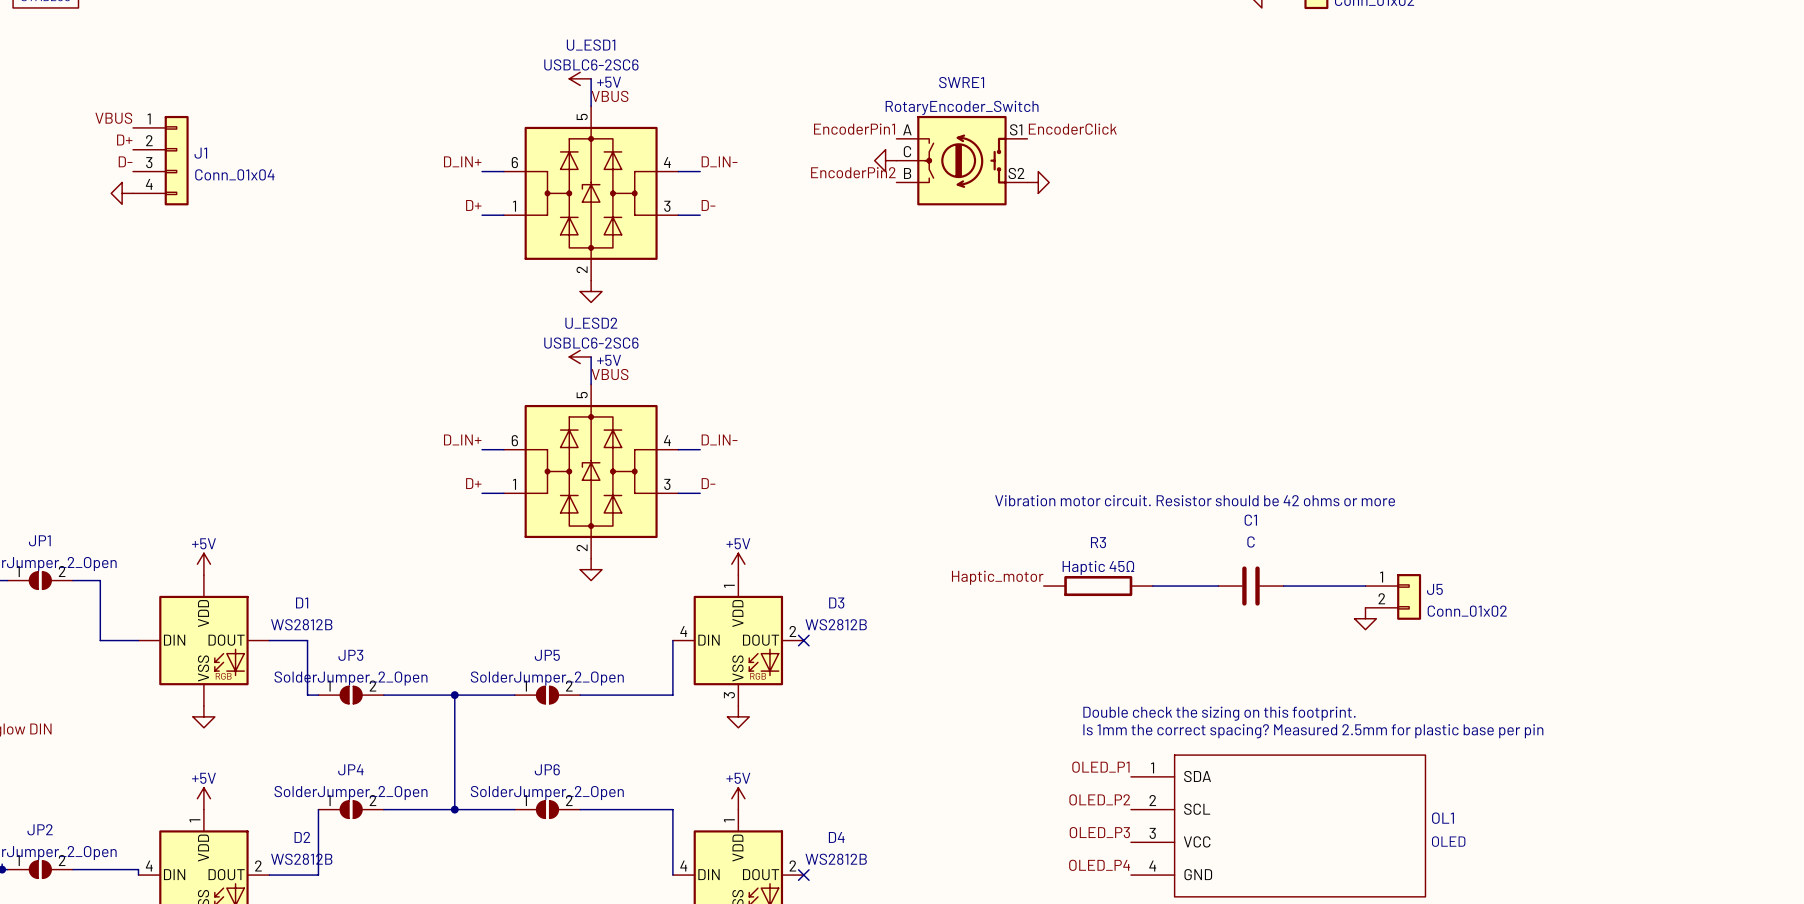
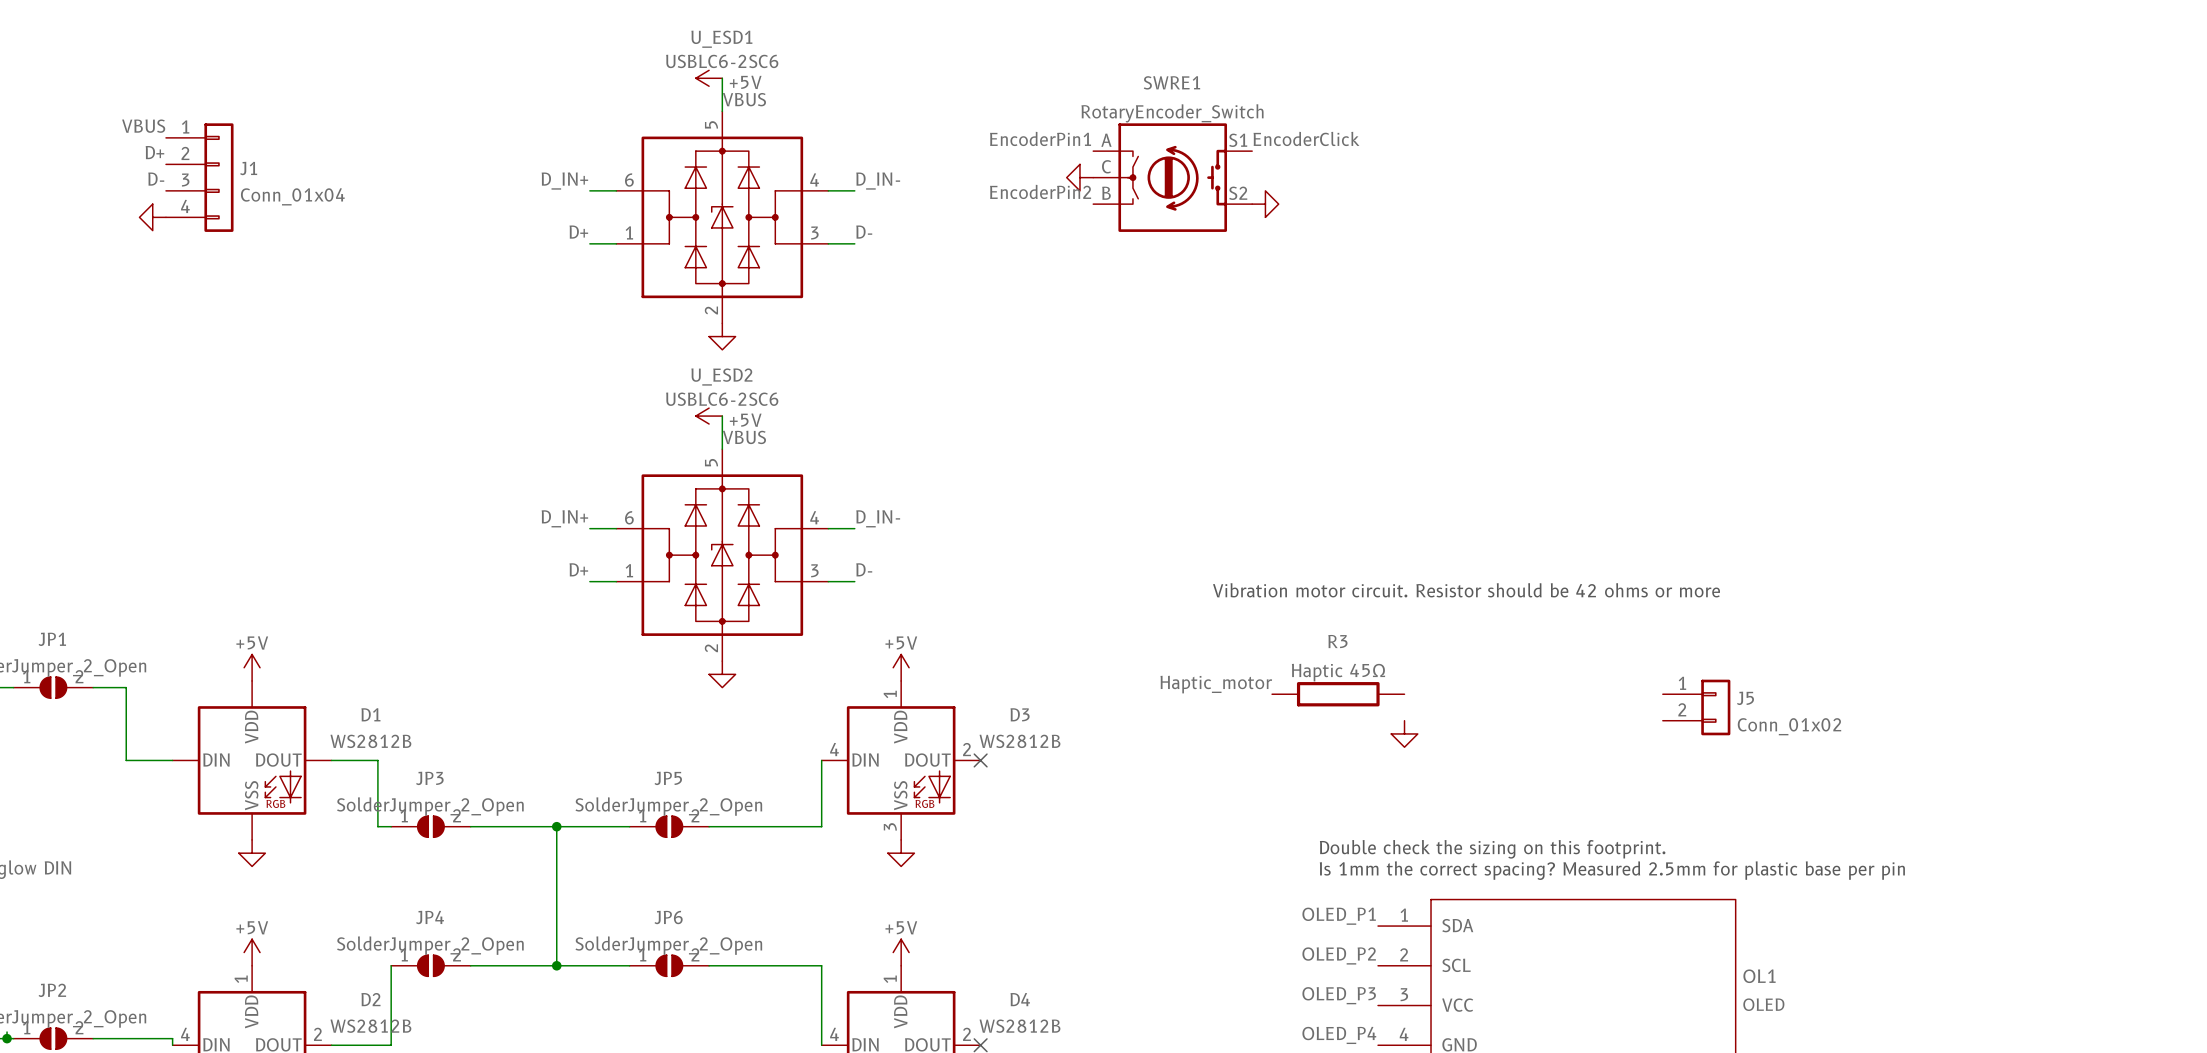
wire: (1152, 586) (1218, 586) -> none
C1: C (1250, 586) -> none
wire: (1283, 586) (1365, 586) -> none
power symbol position: (1365, 618) -> (1404, 733)

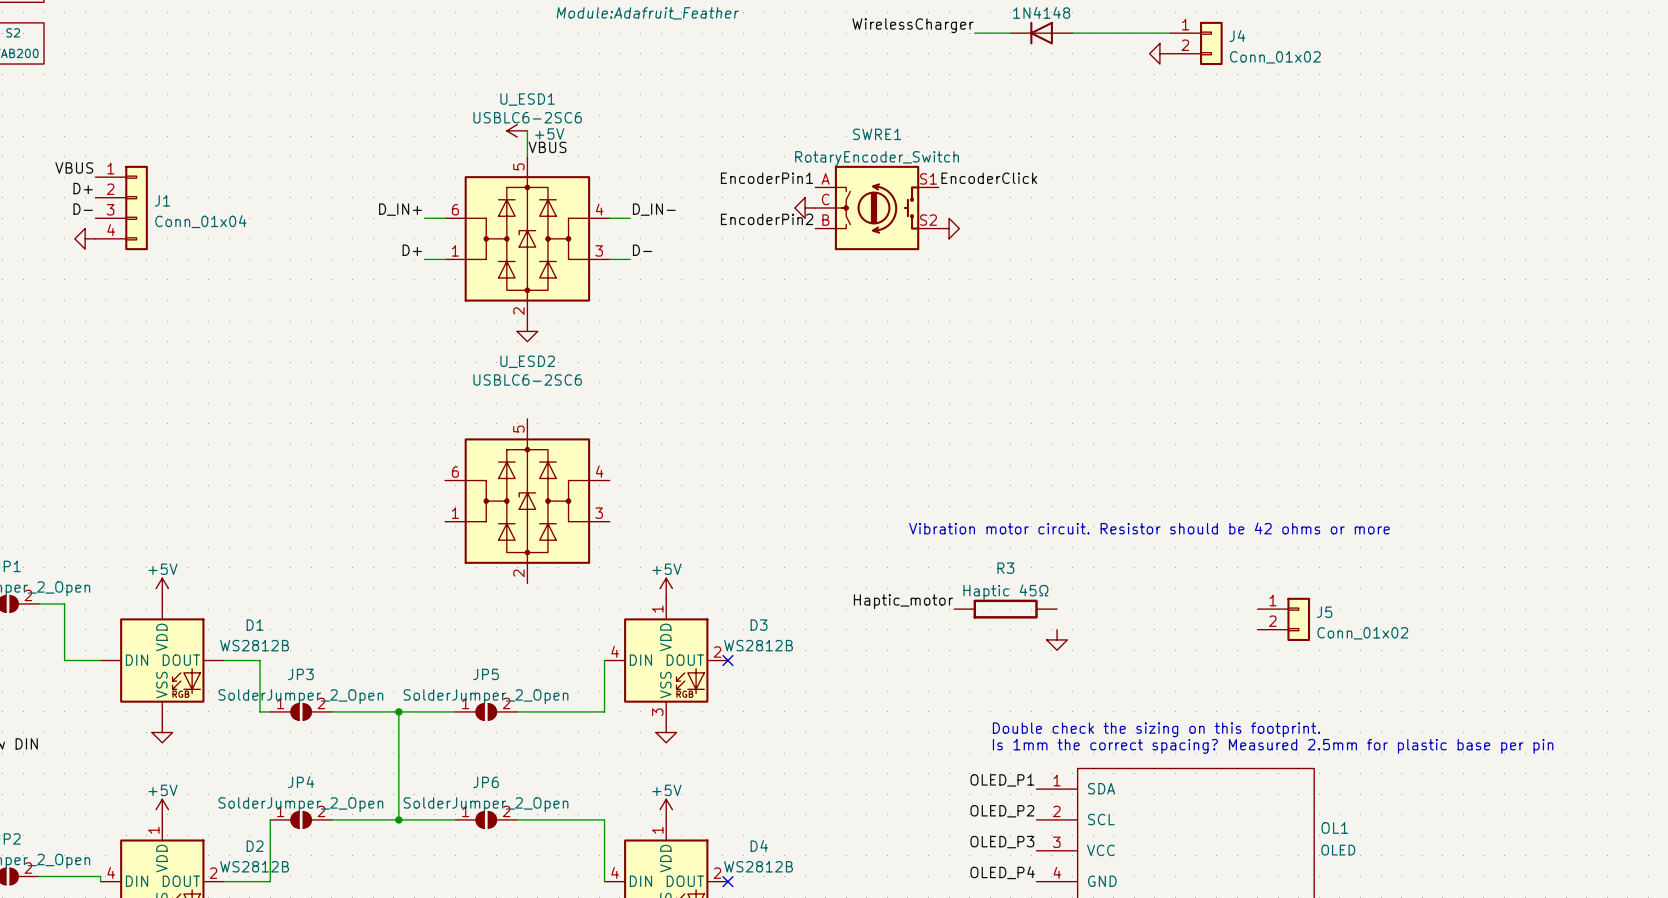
power symbol: +5V (709, 416) -> none
wire: (722, 416) (722, 449) -> none
label: VBUS (744, 437) -> none
label: D_IN+ (564, 518) -> none
label: D_IN- (878, 518) -> none
wire: (589, 528) (616, 528) -> none
wire: (828, 528) (854, 528) -> none
label: D+ (578, 569) -> none
label: D- (864, 569) -> none
wire: (589, 581) (616, 581) -> none
wire: (828, 581) (854, 581) -> none
power symbol: (722, 674) -> none

